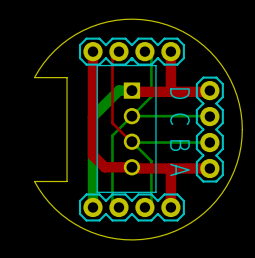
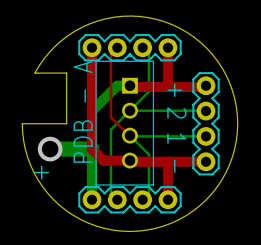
text: D (179, 93) -> + (174, 90)
text: none -> PDB - A (83, 111)
text: C (179, 119) -> 2 (176, 112)
board edge: (67, 129) (67, 181) (34, 181) (38, 188) (61, 214) (83, 228) (107, 237) (133, 239) (158, 236) (175, 231) (197, 218) (210, 207) (226, 186) (234, 171) (239, 155) (242, 129) -> (66, 123) (22, 123) (27, 157) (38, 180) (53, 199) (73, 215) (96, 226) (129, 231) (146, 230) (171, 223) (186, 215) (206, 199) (221, 180) (229, 164) (236, 140) (237, 123)
text: B (179, 145) -> 1 (176, 138)
bottom track: none -> (50, 149) (91, 149)
via: none -> (50, 149)
text: A (179, 169) -> - (174, 166)
text: none -> + (41, 172)

